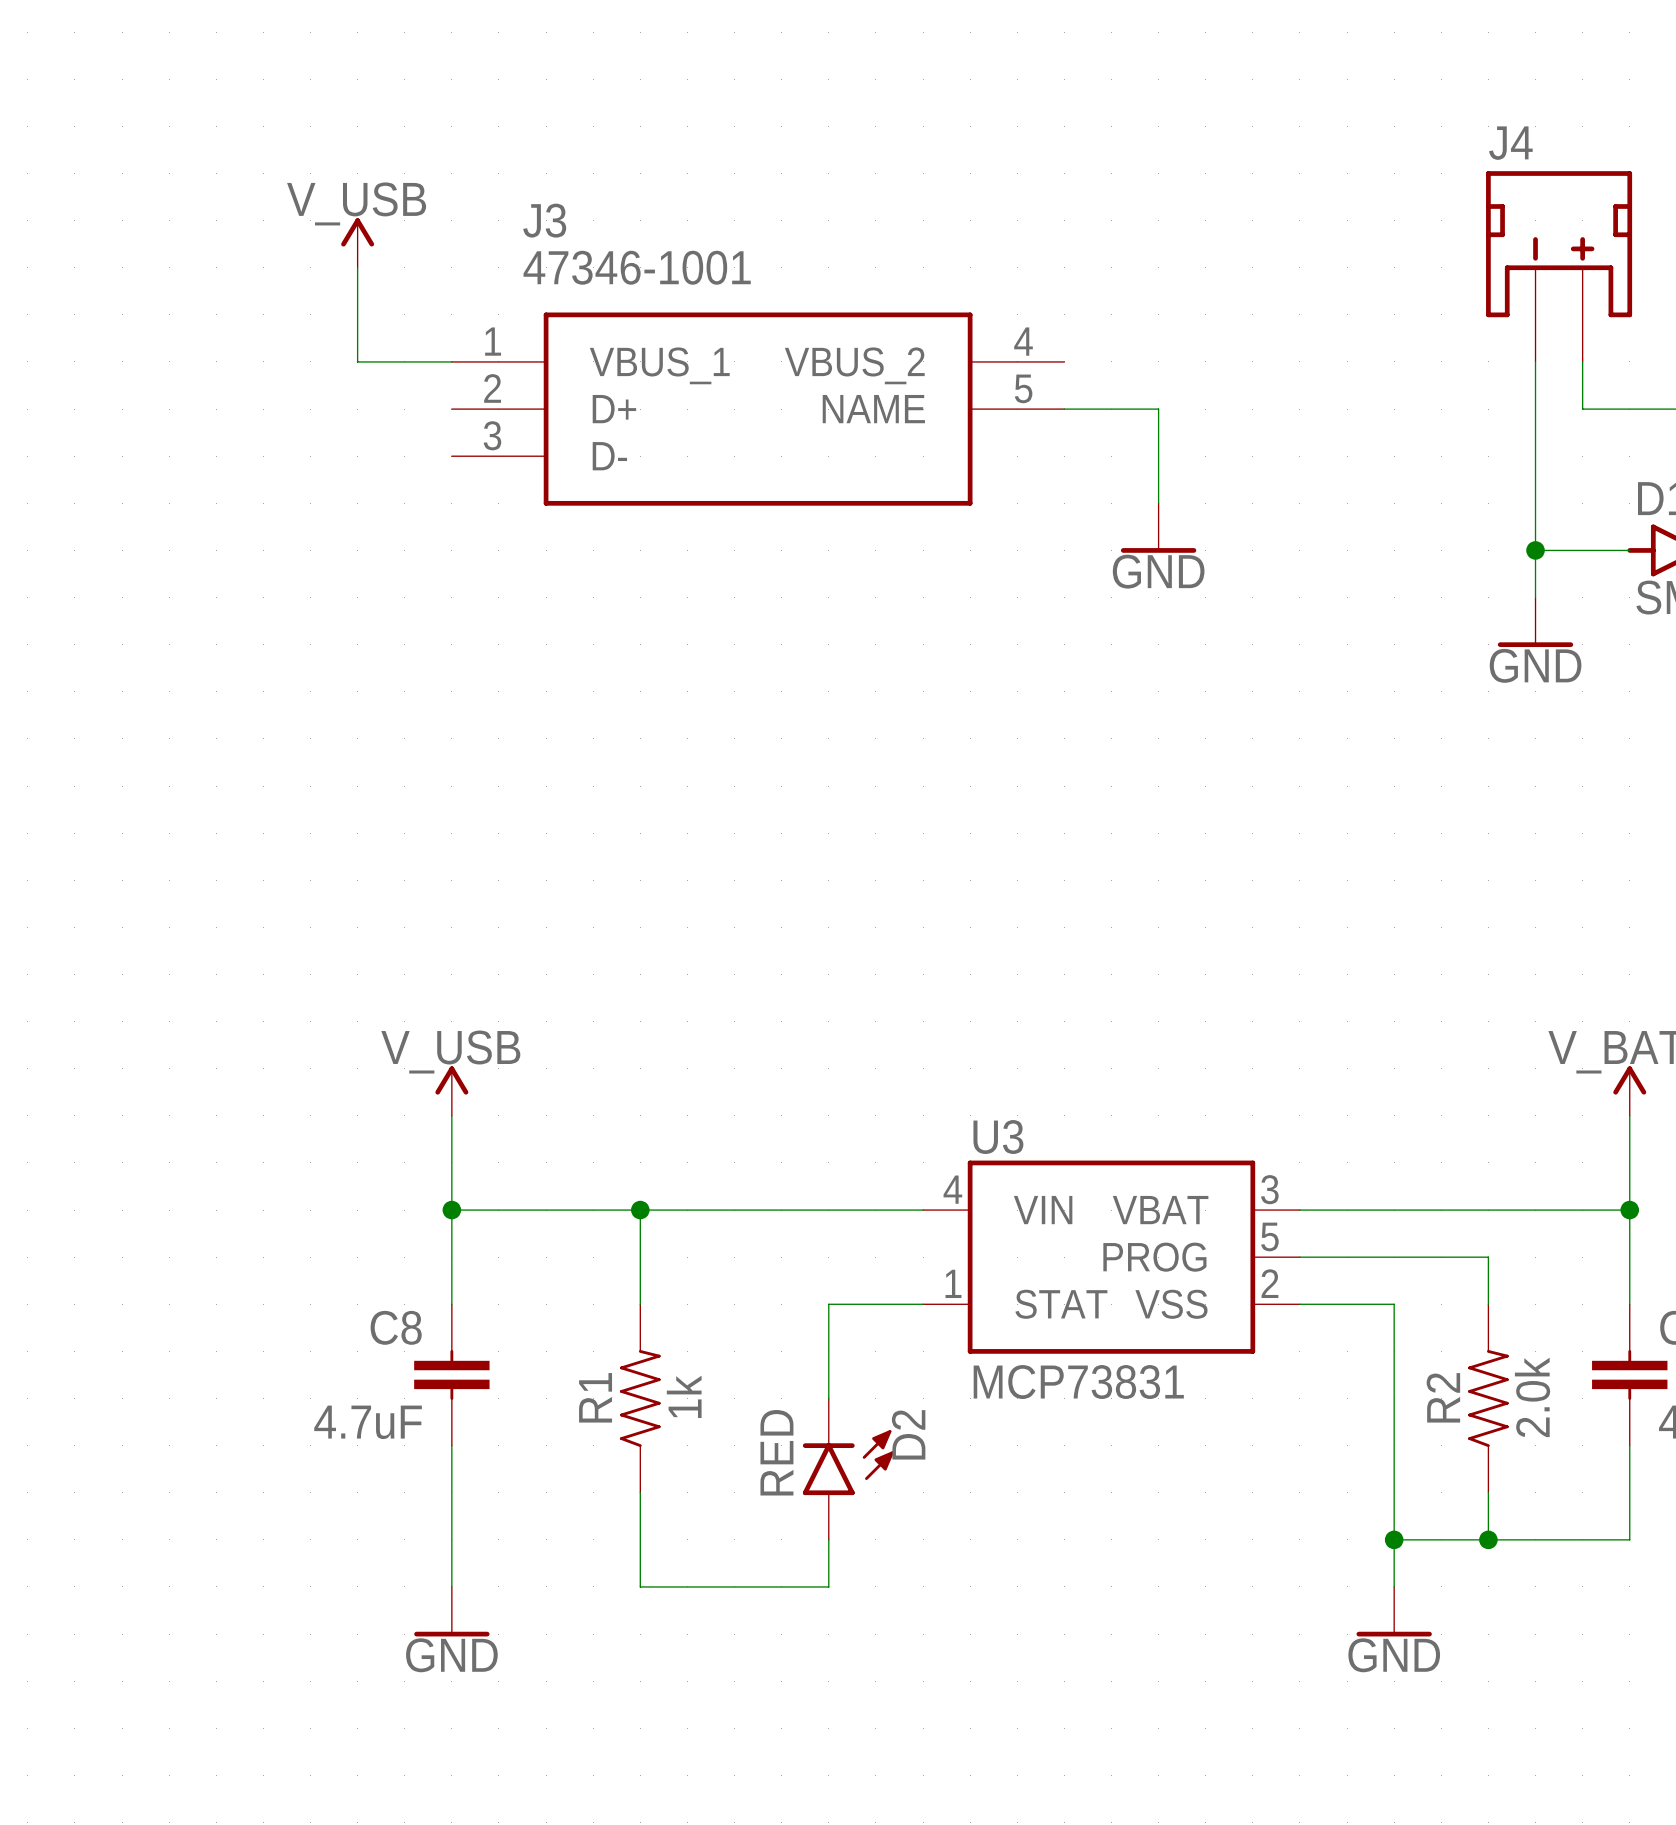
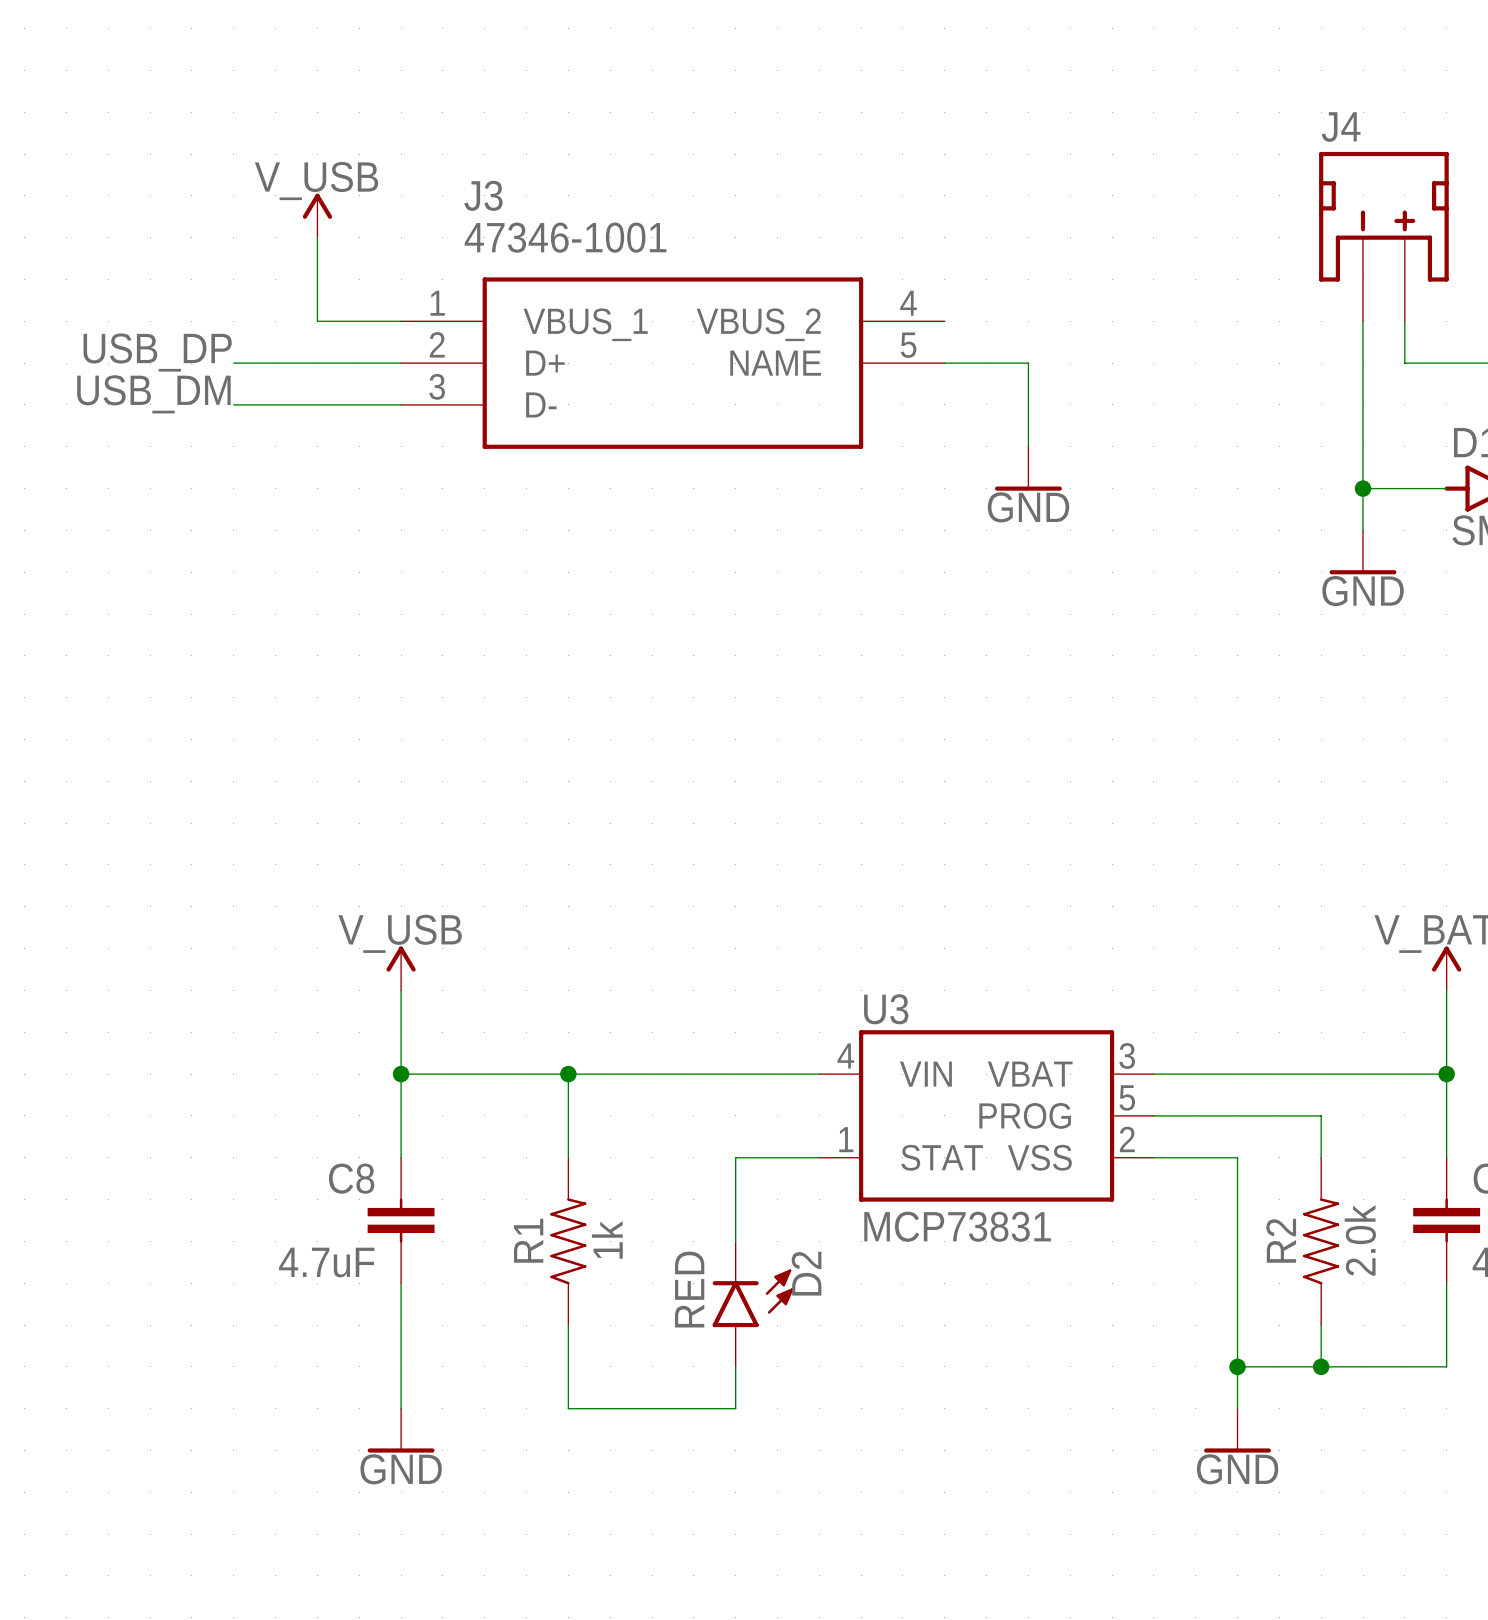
label: none -> USB_DP (157, 352)
wire: none -> (233, 363) (401, 363)
label: none -> USB_DM (153, 394)
wire: none -> (233, 404) (401, 404)

